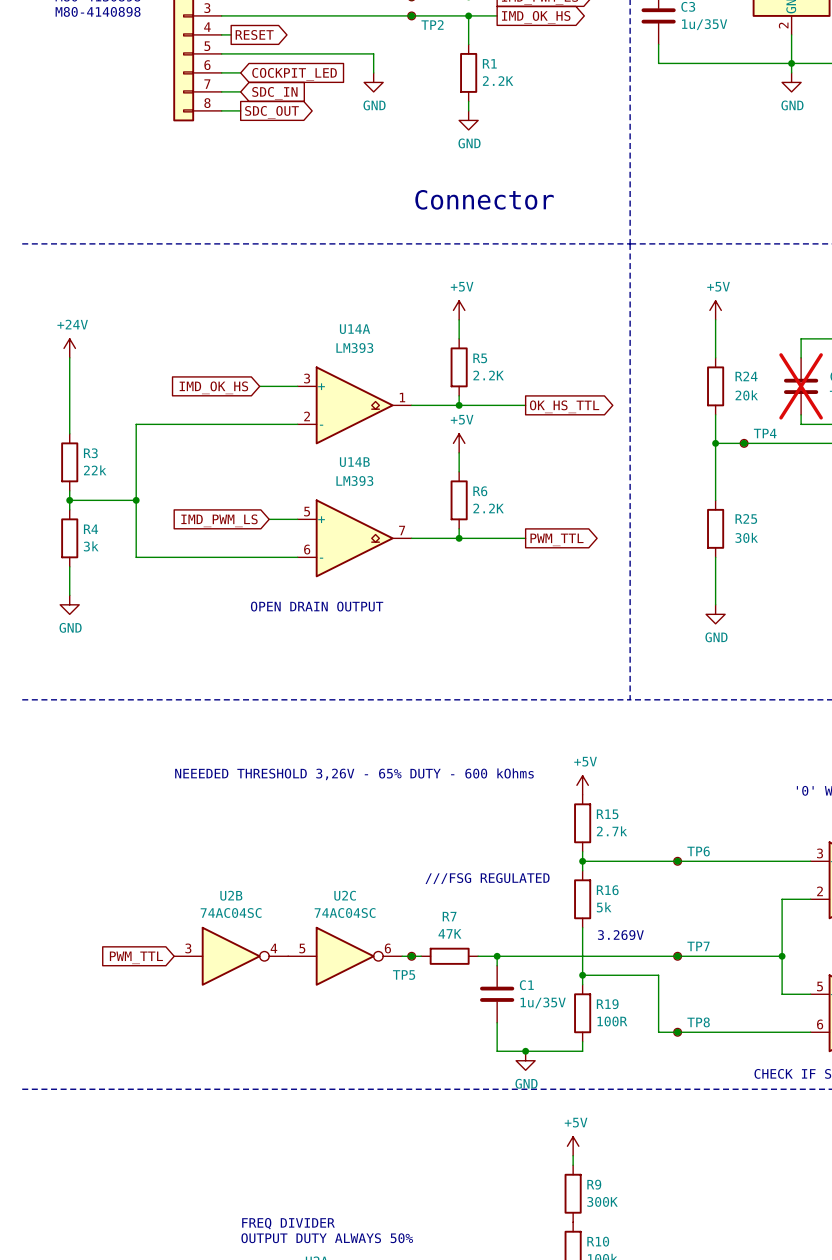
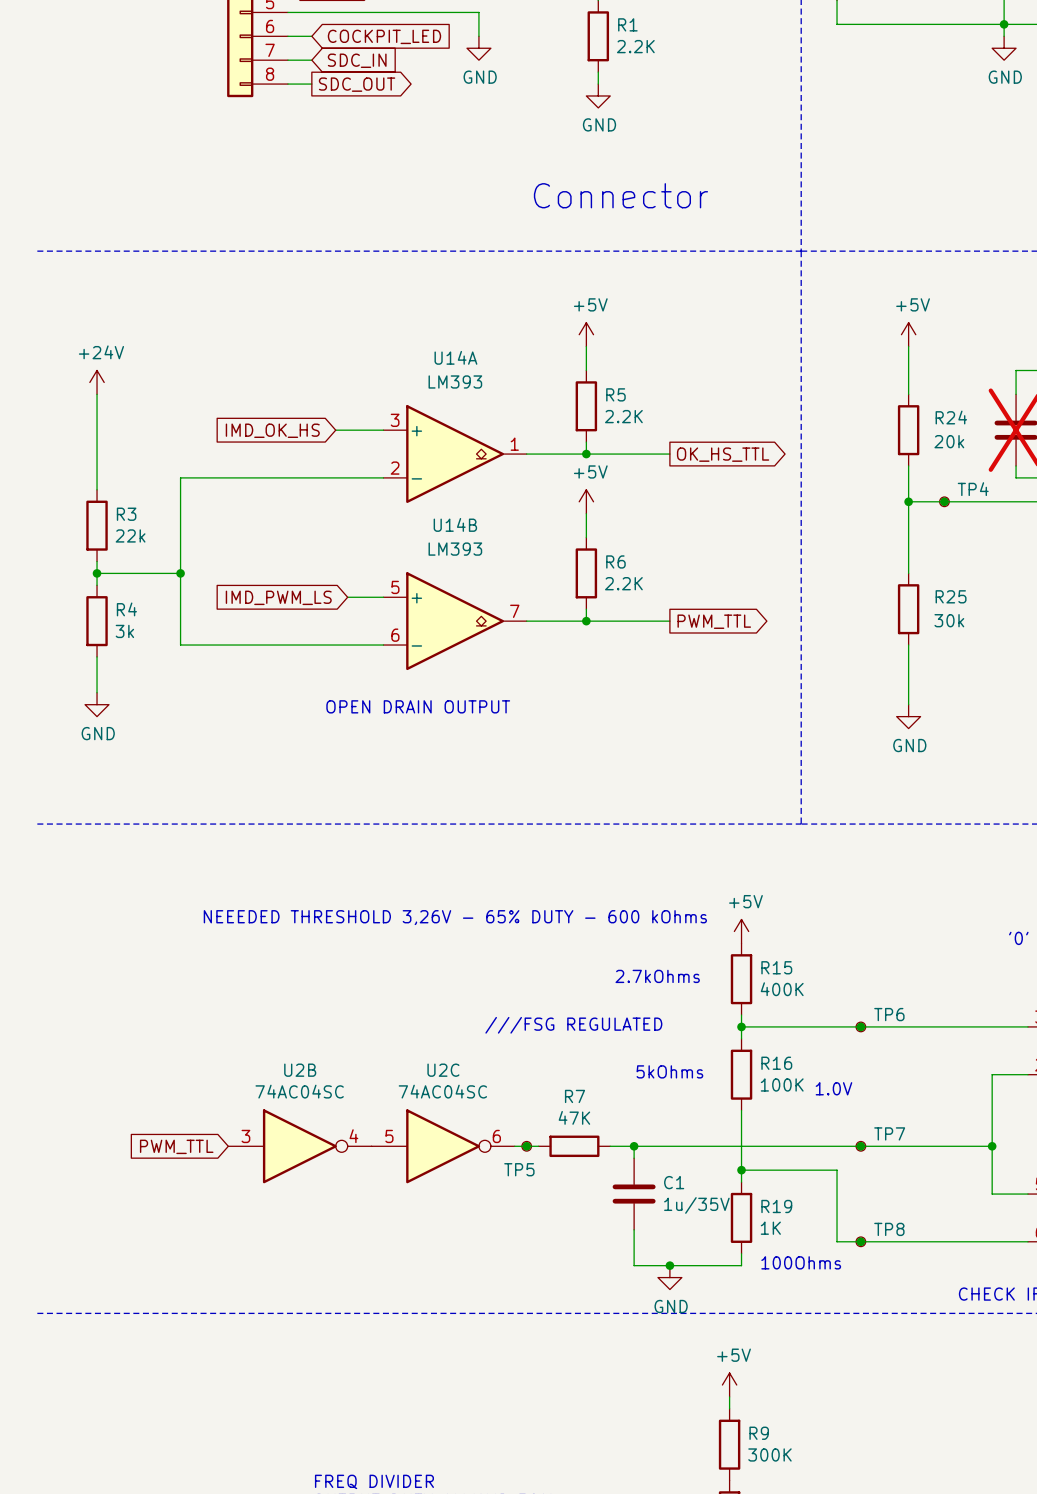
text: none -> 2.7kOhms (657, 976)
R15 value: 2.7k (612, 831) -> 400K (782, 989)
text position: ///FSG REGULATED (487, 878) -> ///FSG REGULATED (573, 1025)
text: none -> 5kOhms (669, 1071)
R16 value: 5k (604, 907) -> 100K (782, 1084)
text: none -> 1.0V (833, 1088)
text: 3.269V (620, 935) -> none
R19 value: 100R (612, 1021) -> 1K (770, 1228)
text: none -> 100Ohms (801, 1262)

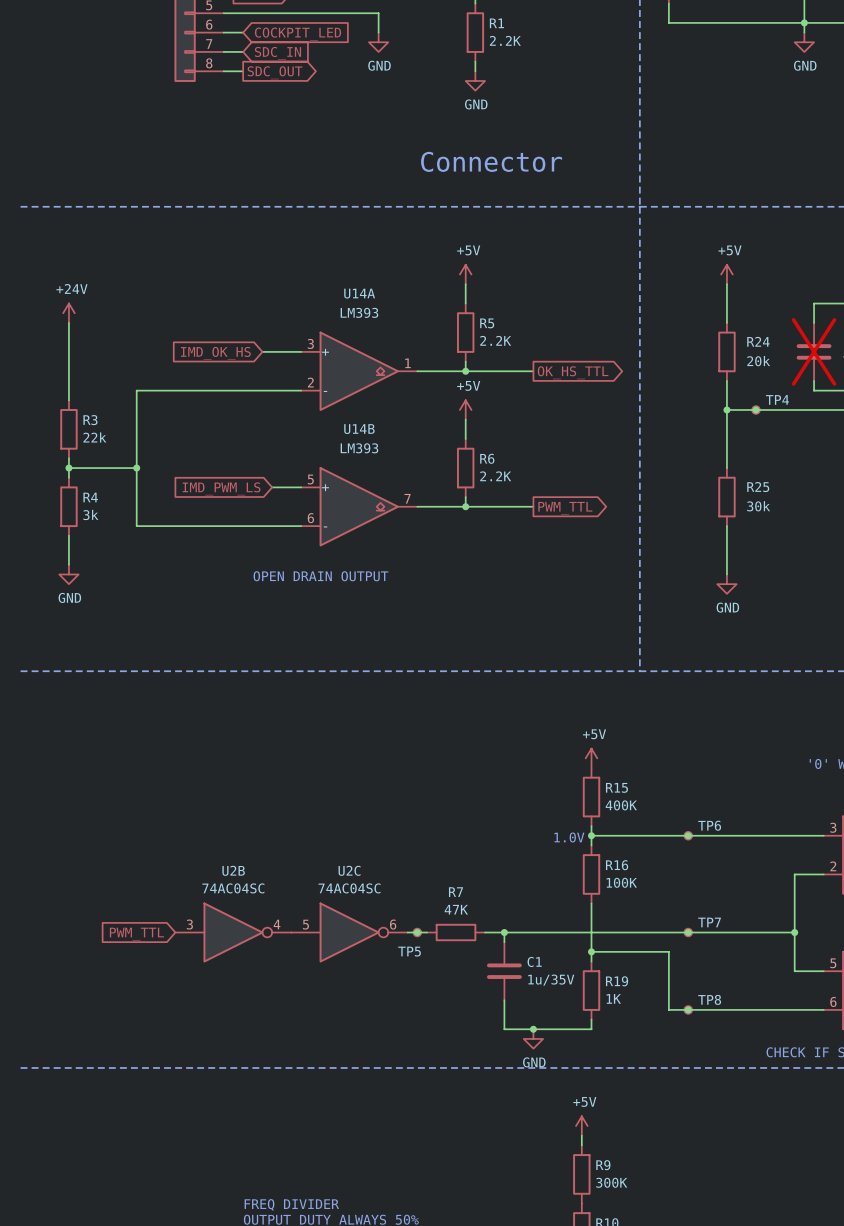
text: NEEEDED THRESHOLD 3,26V - 65% DUTY - 600 kOhms (455, 917) -> none
text: 2.7kOhms (657, 976) -> none
text: ///FSG REGULATED (573, 1025) -> none
text: 5kOhms (669, 1071) -> none
text position: 1.0V (833, 1088) -> 1.0V (569, 837)
text: 100Ohms (801, 1262) -> none

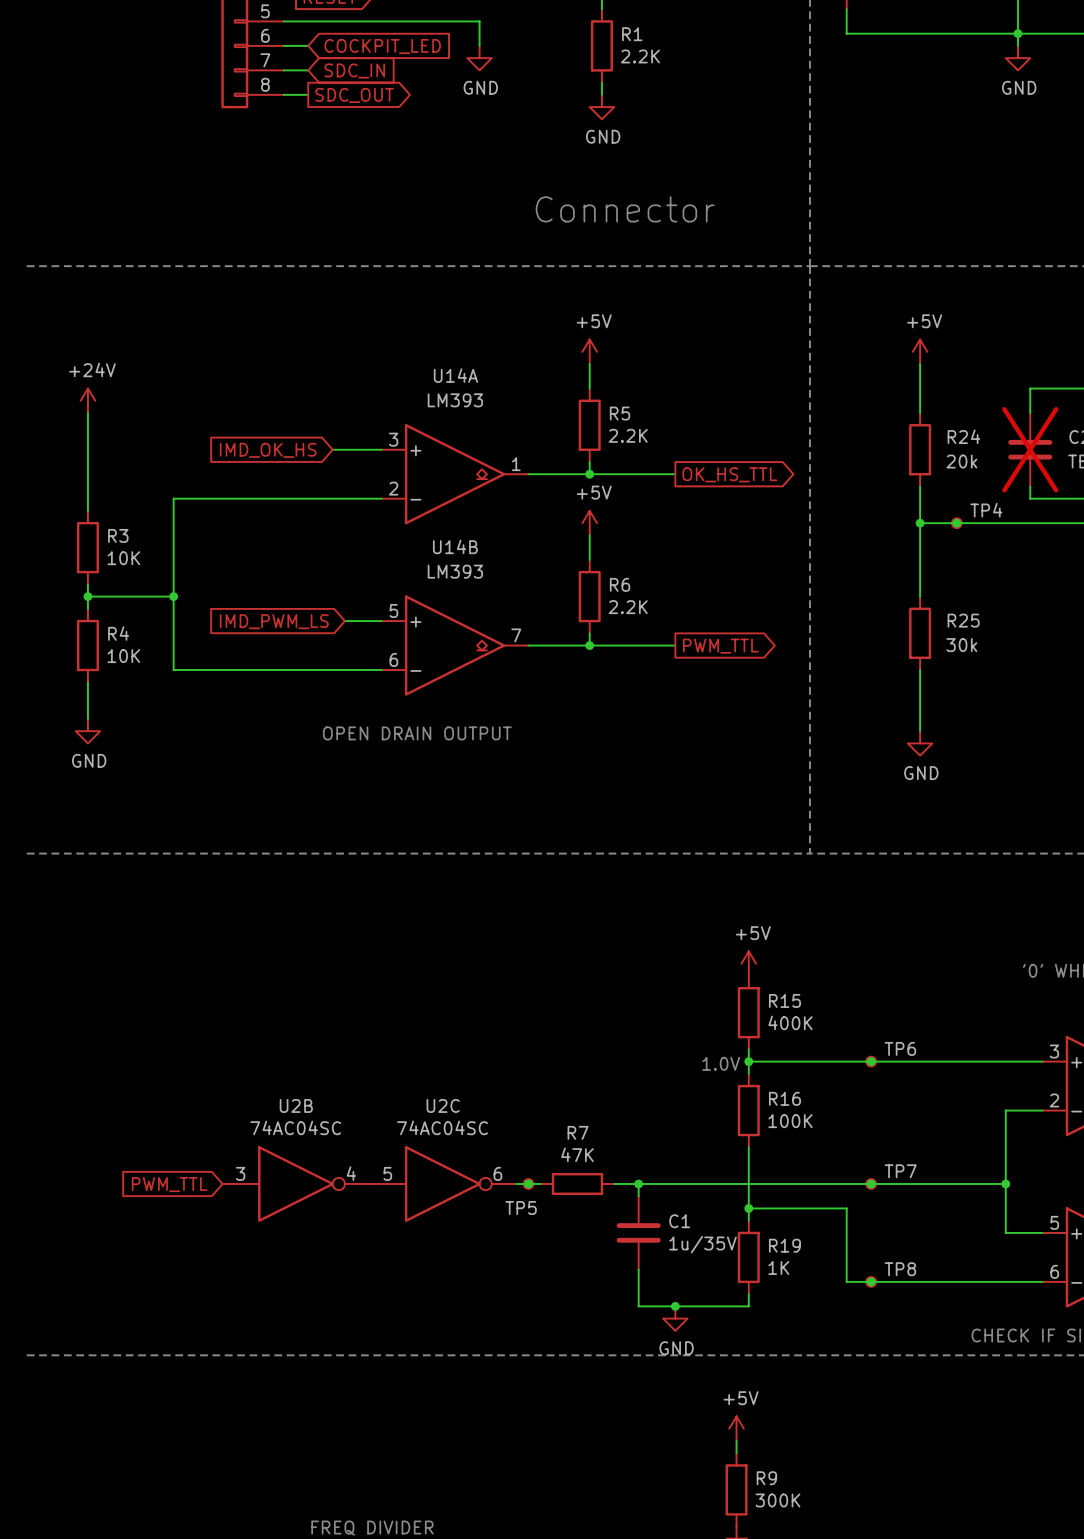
R3 value: 22k (94, 437) -> 10K (123, 558)
R4 value: 3k (90, 514) -> 10K (123, 656)

